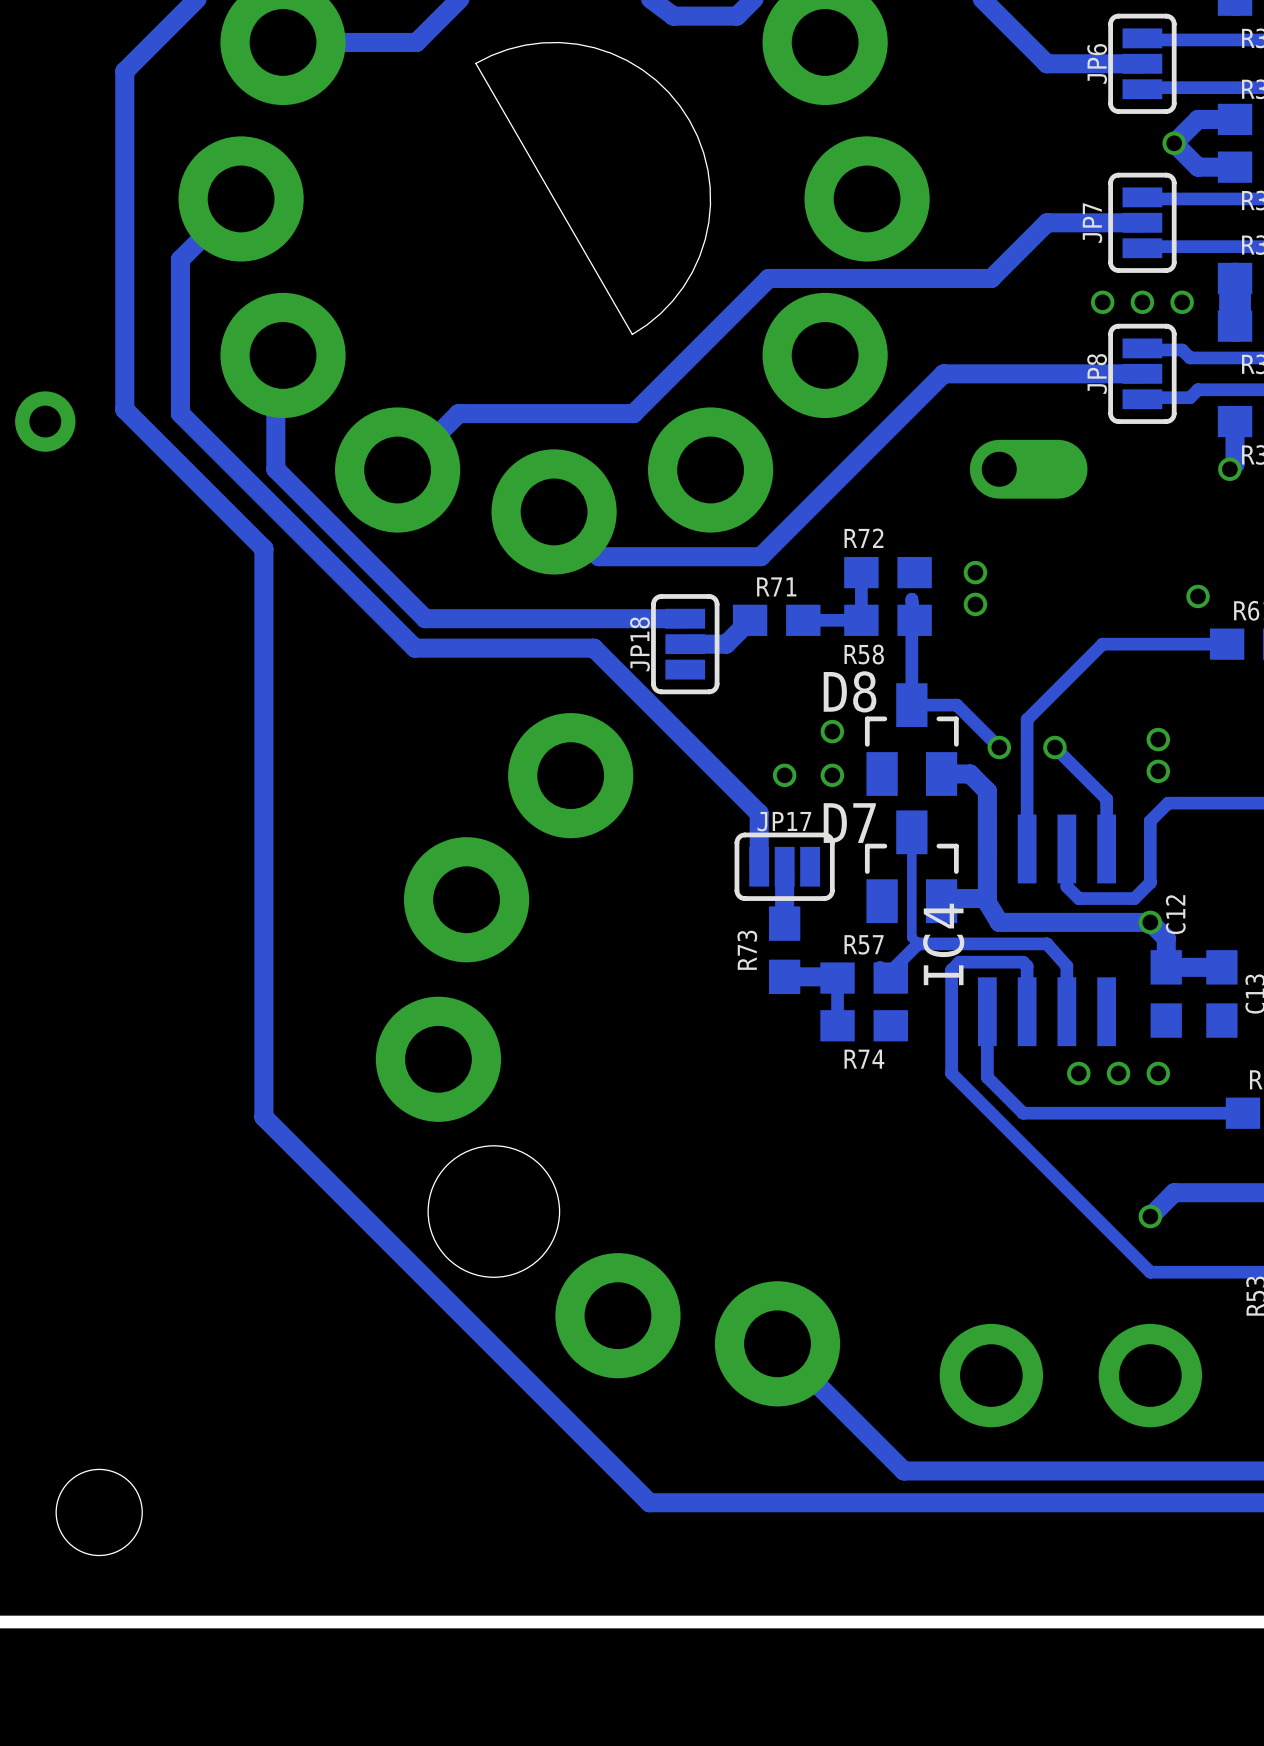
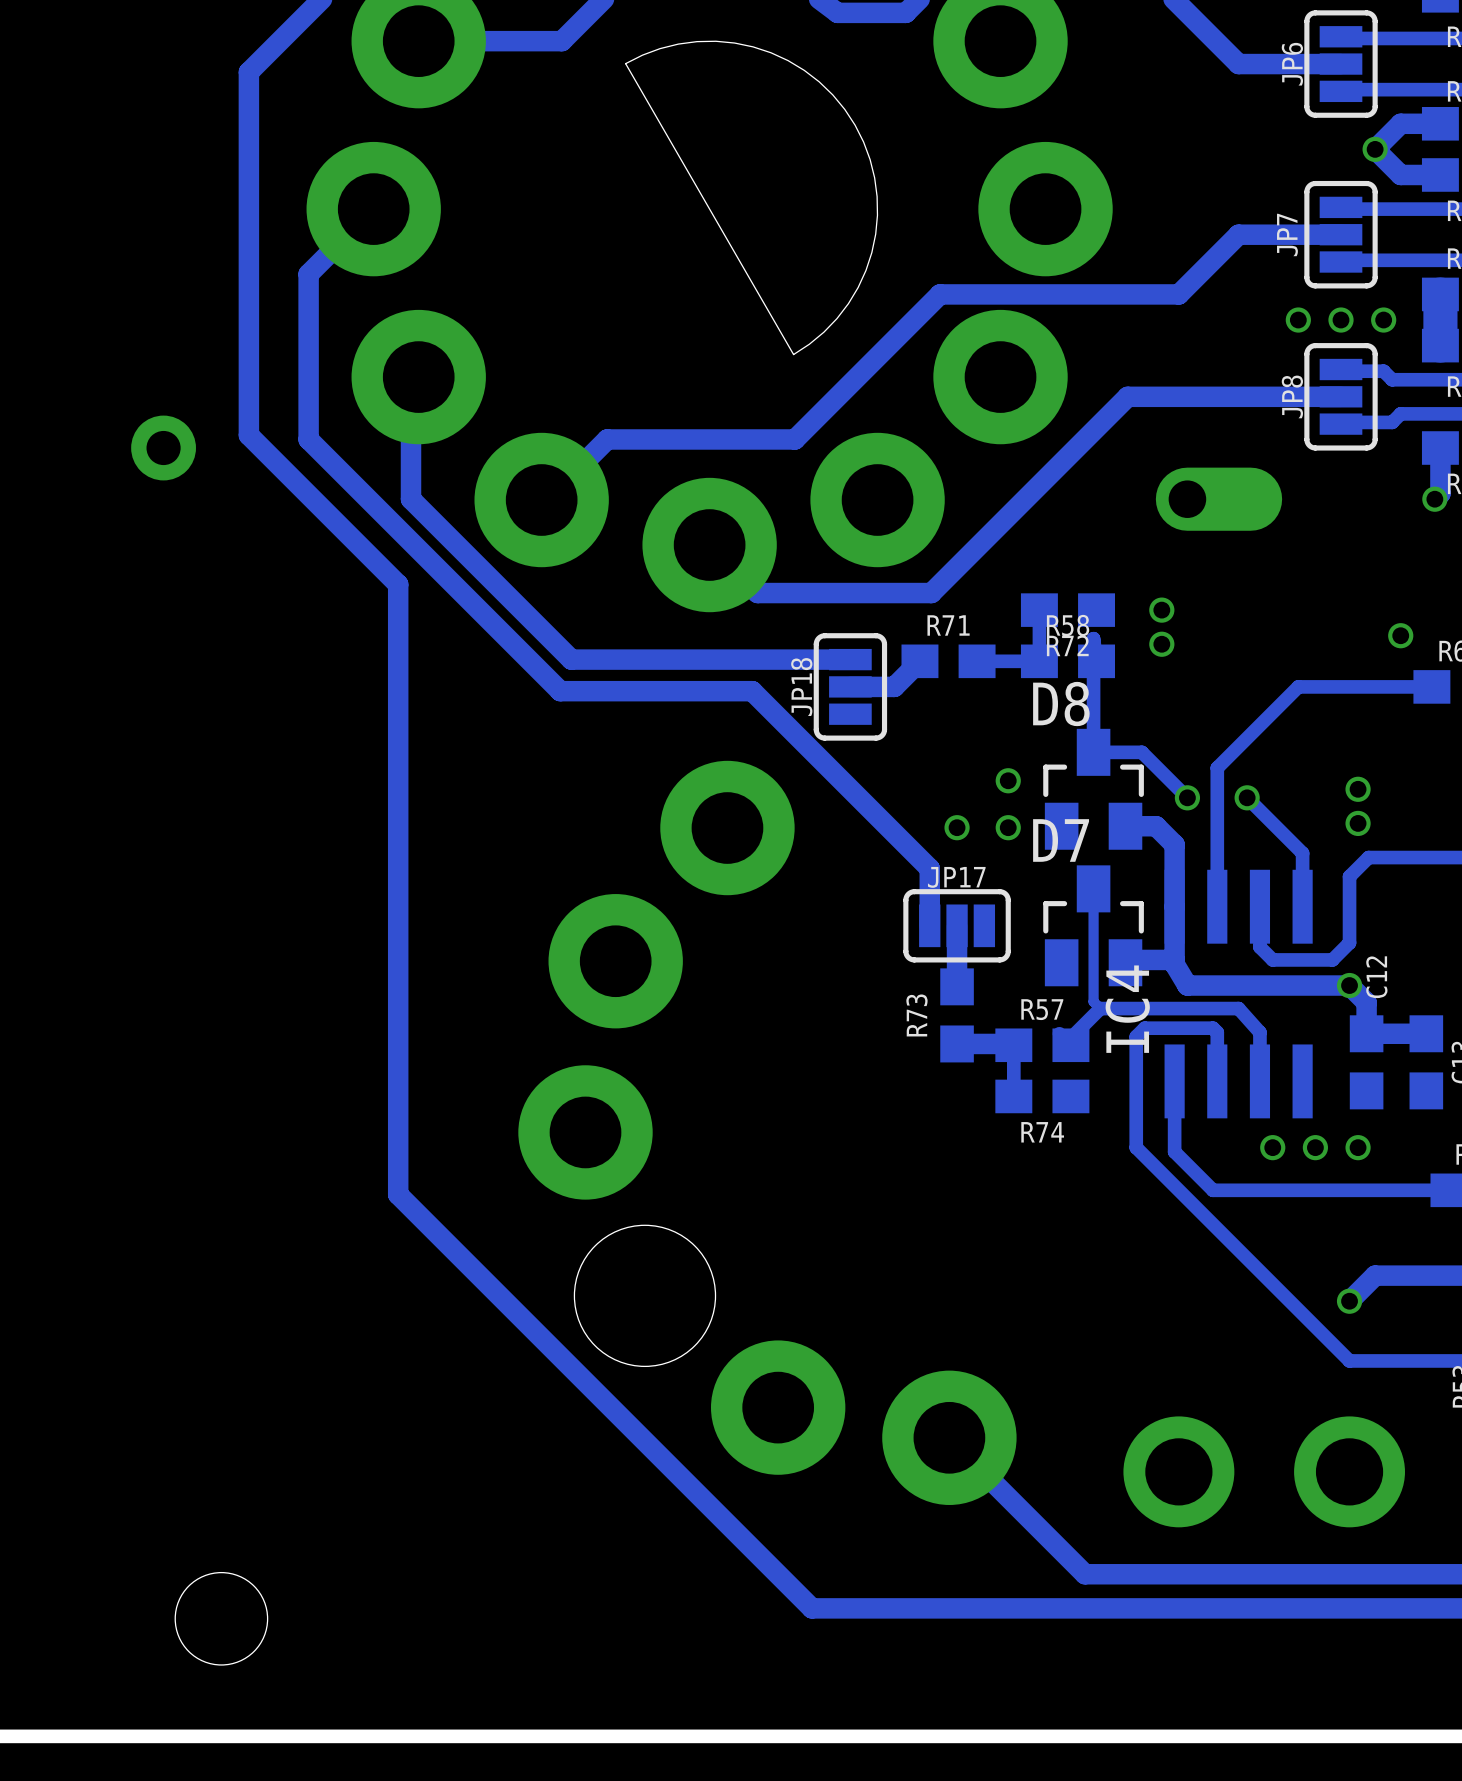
R72 name position: R72 (863, 538) -> R72 (1067, 645)
R58 name position: R58 (864, 654) -> R58 (1068, 625)
D8 name position: D8 (850, 691) -> D8 (1061, 704)
D7 name position: D7 (849, 823) -> D7 (1061, 840)

